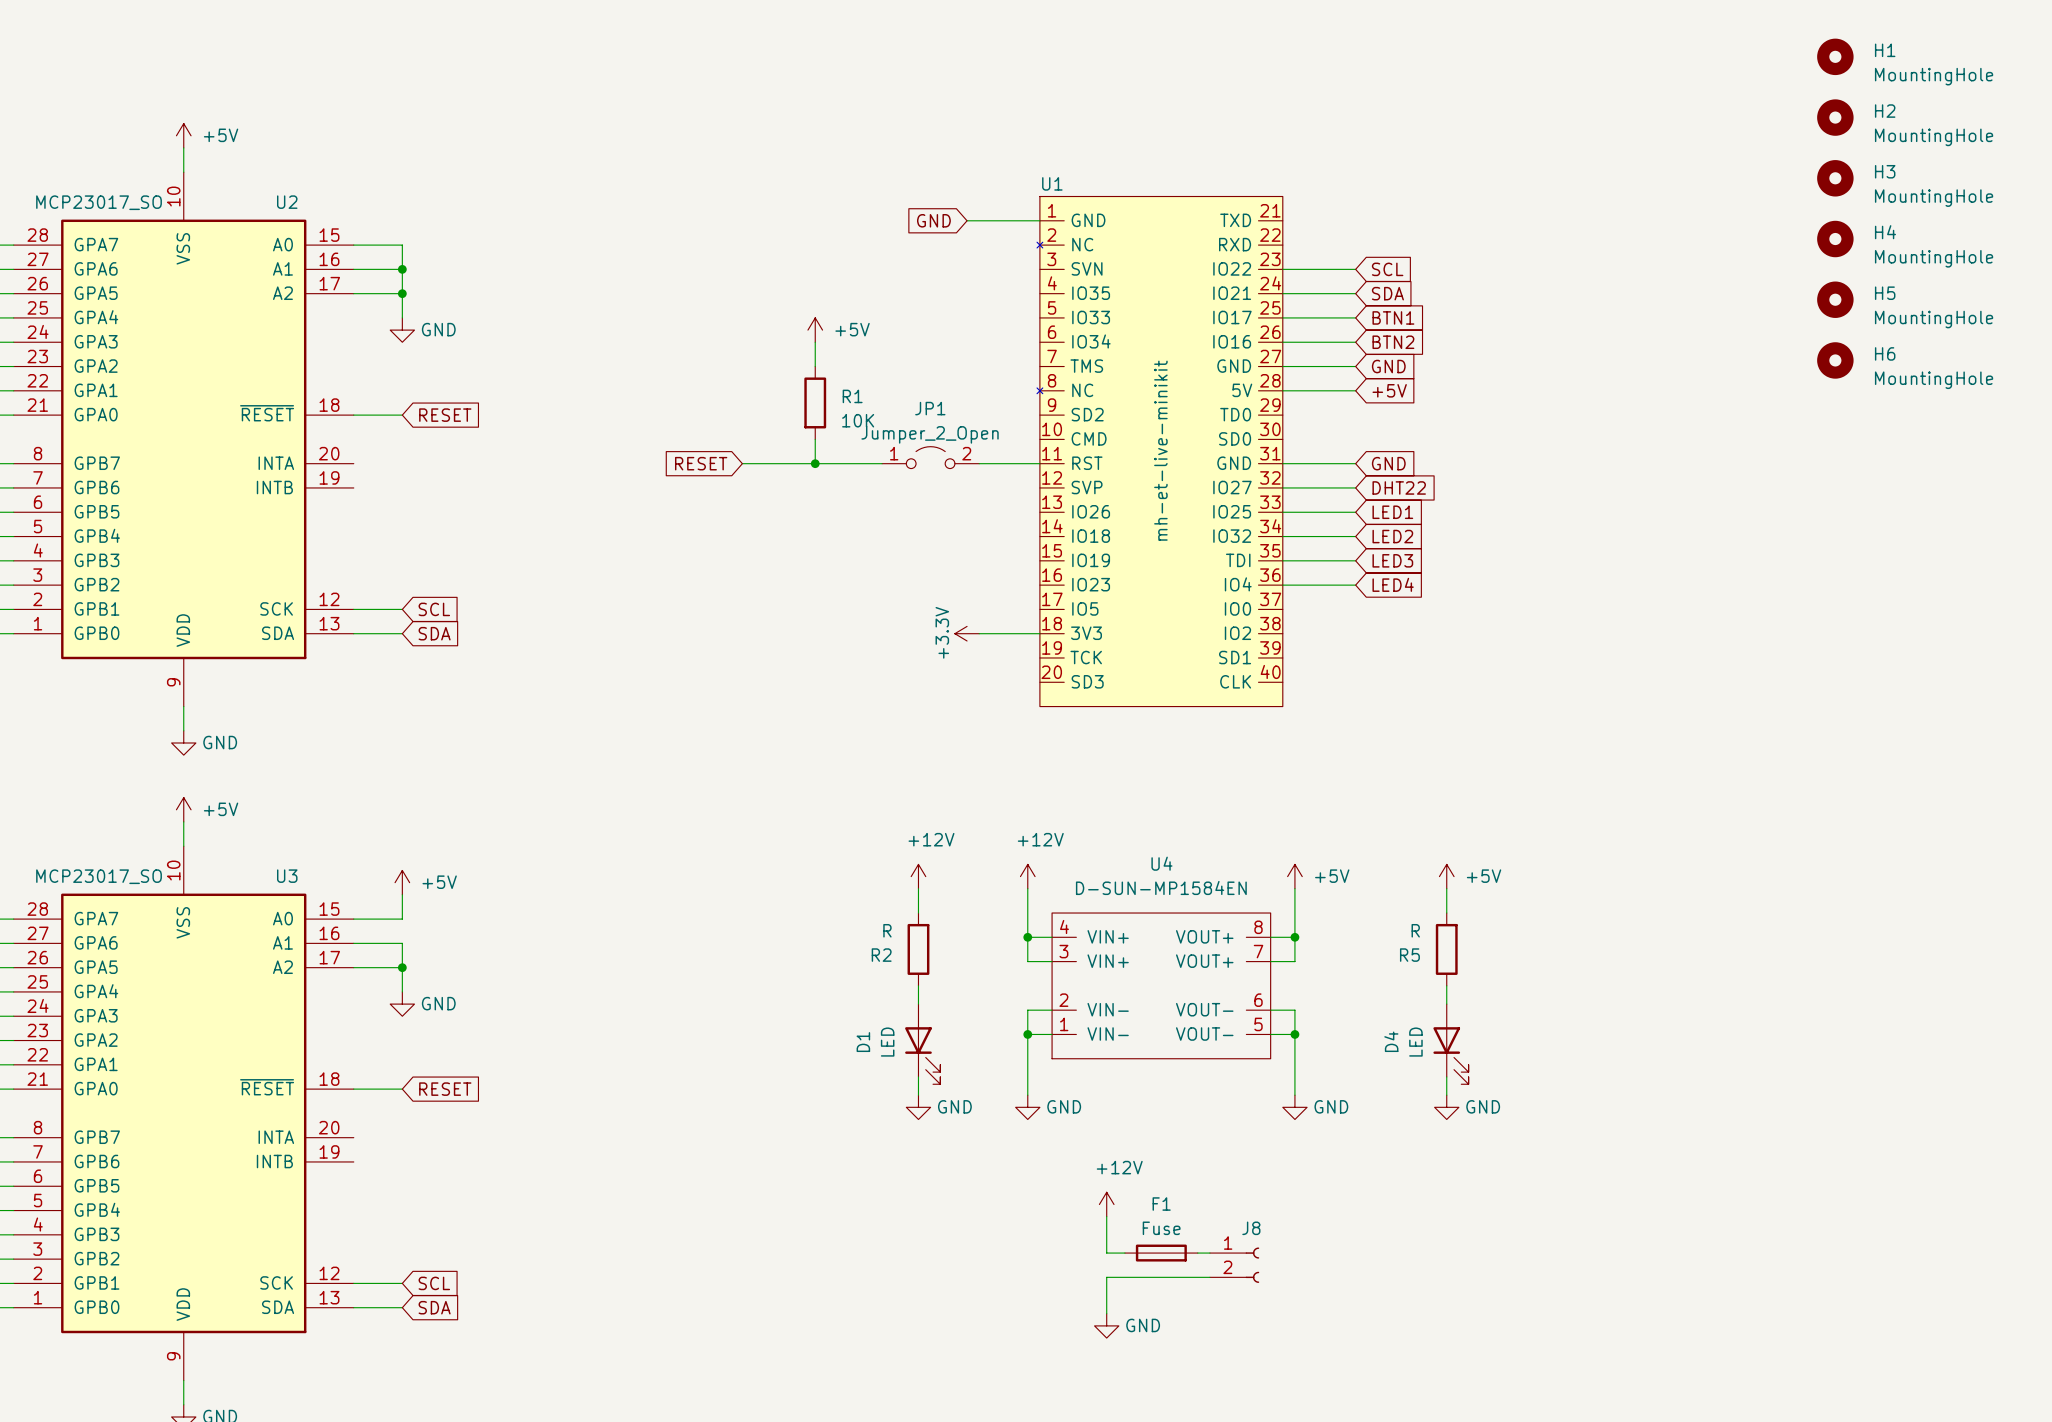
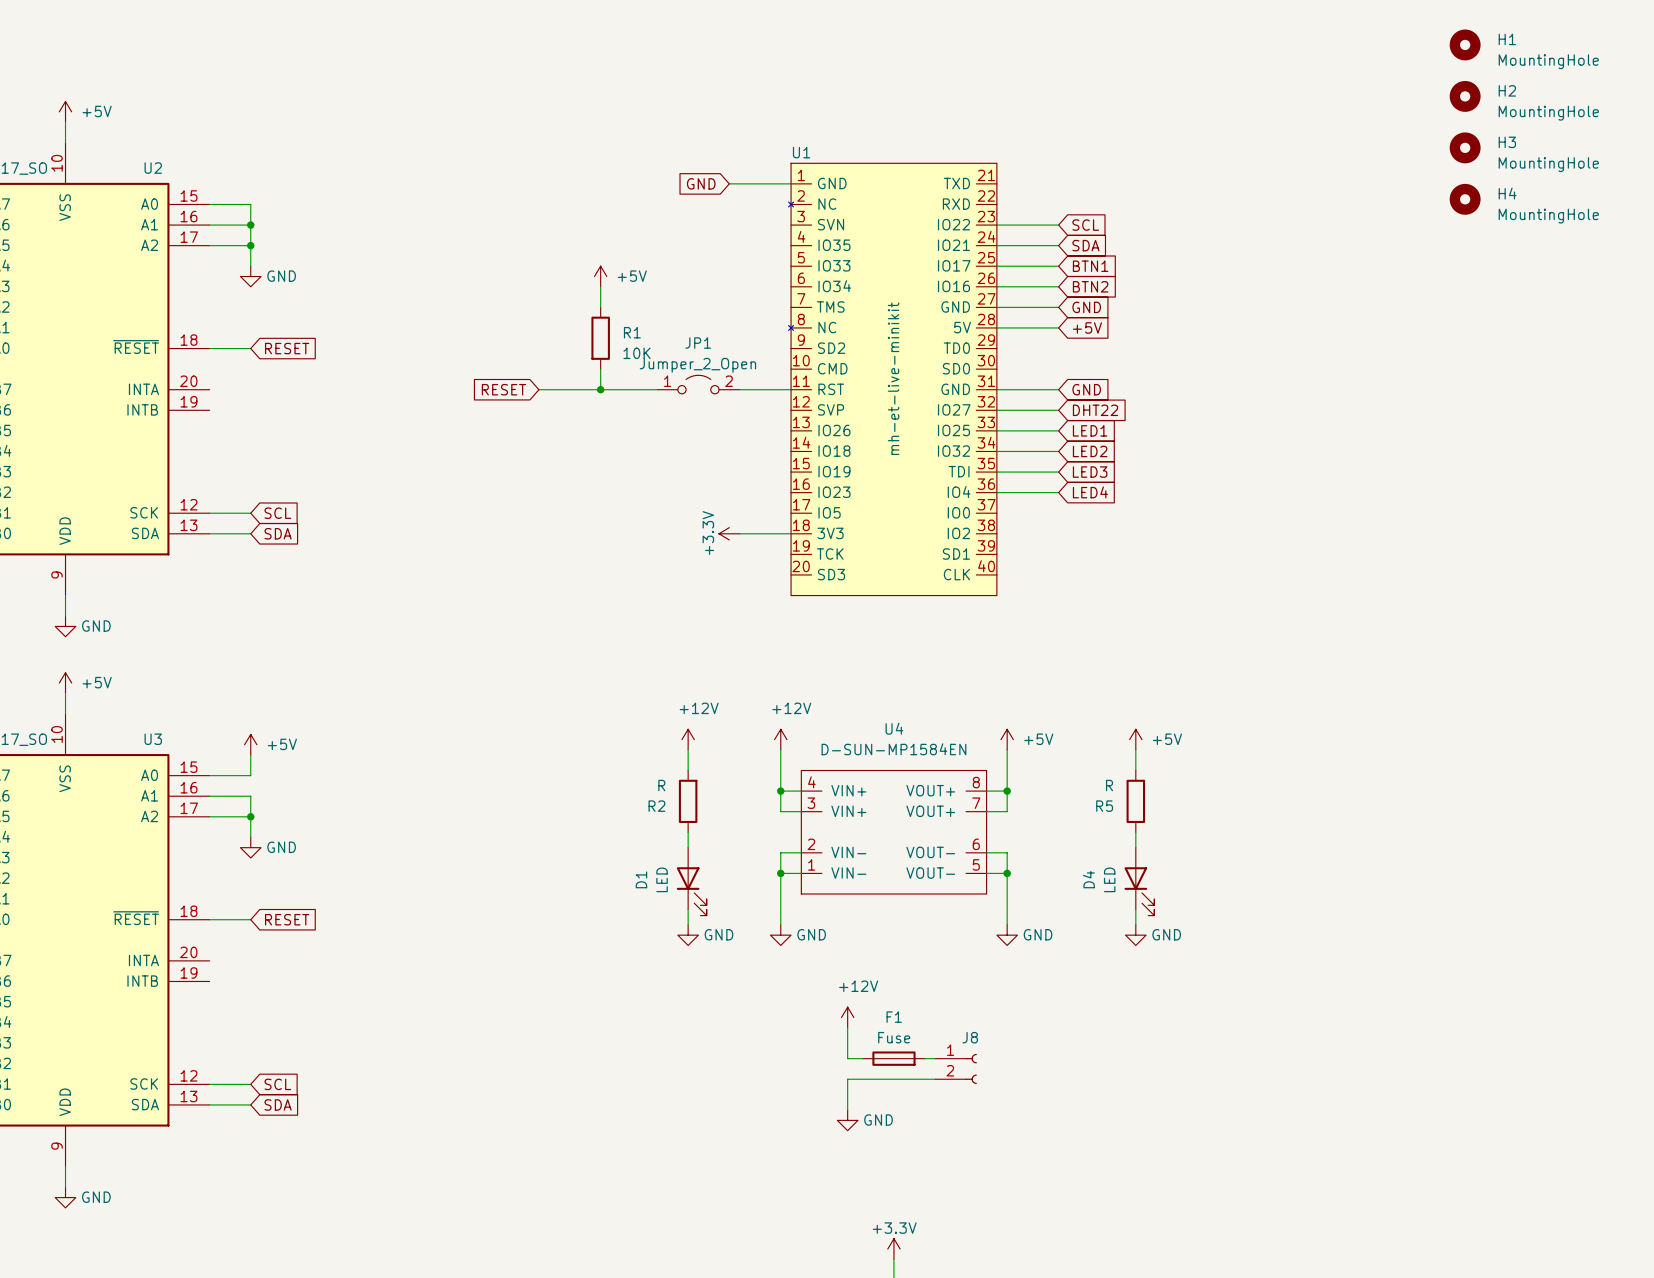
H5: MountingHole (1835, 299) -> none
H6: MountingHole (1835, 360) -> none

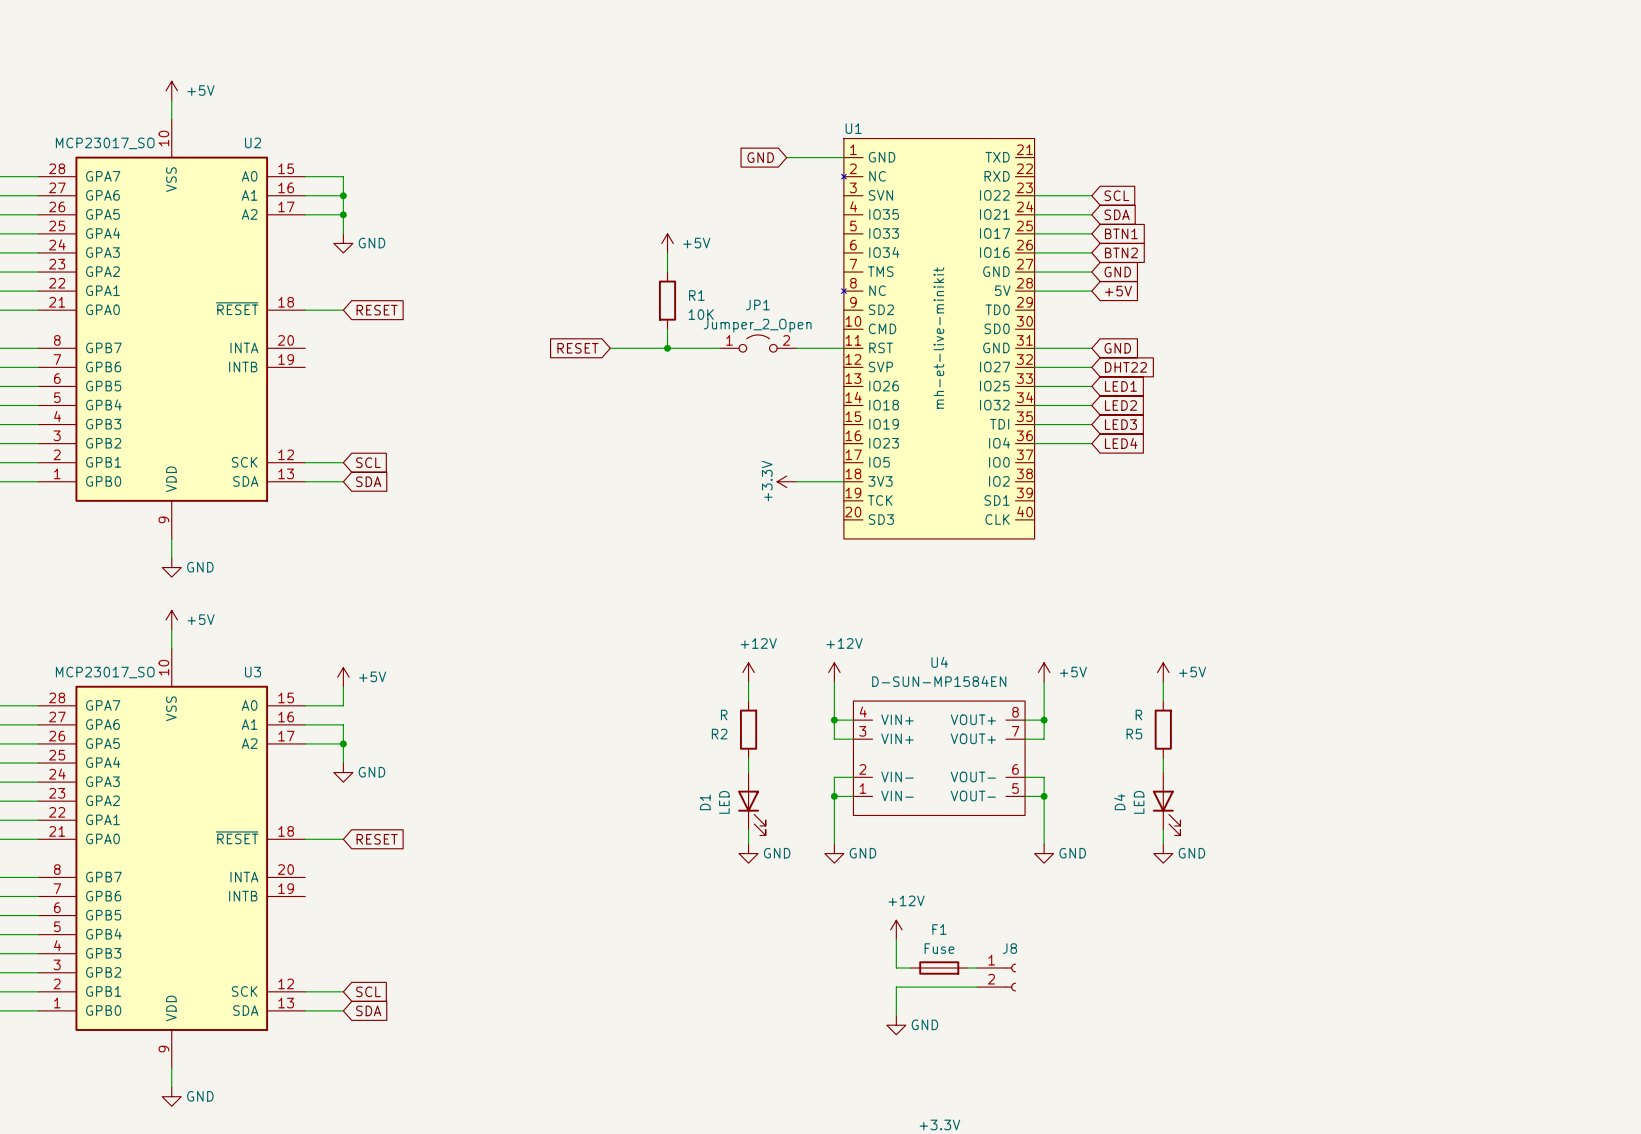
H1: MountingHole (1465, 44) -> none
H2: MountingHole (1465, 96) -> none
H3: MountingHole (1465, 147) -> none
H4: MountingHole (1465, 199) -> none

